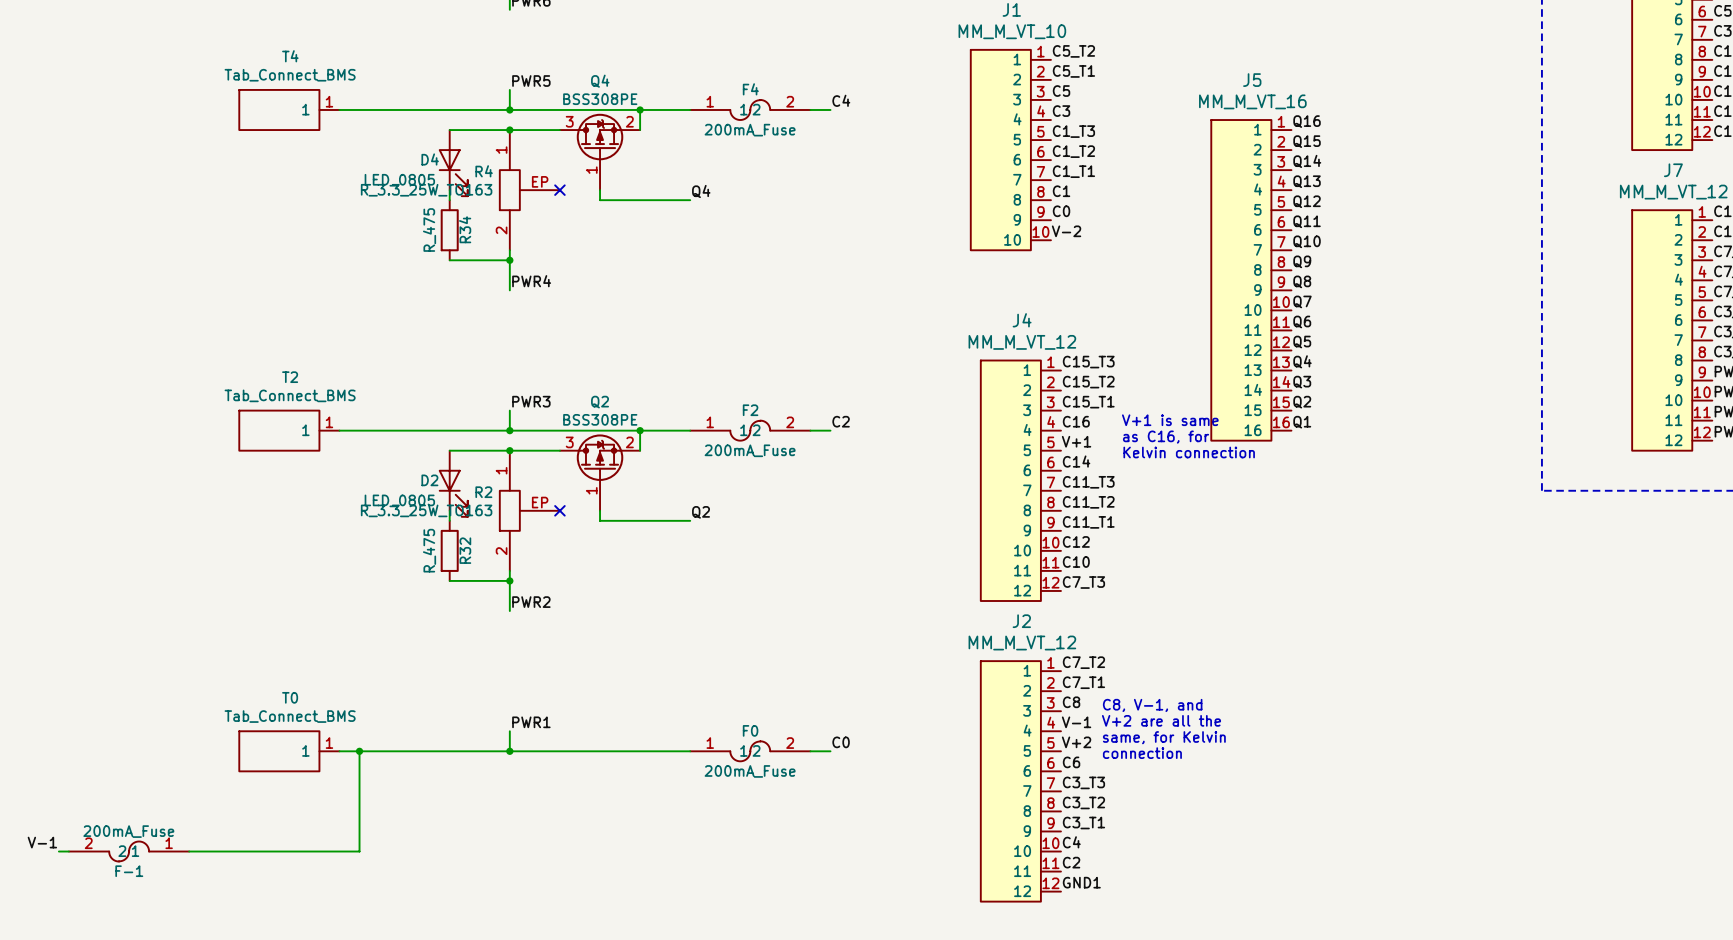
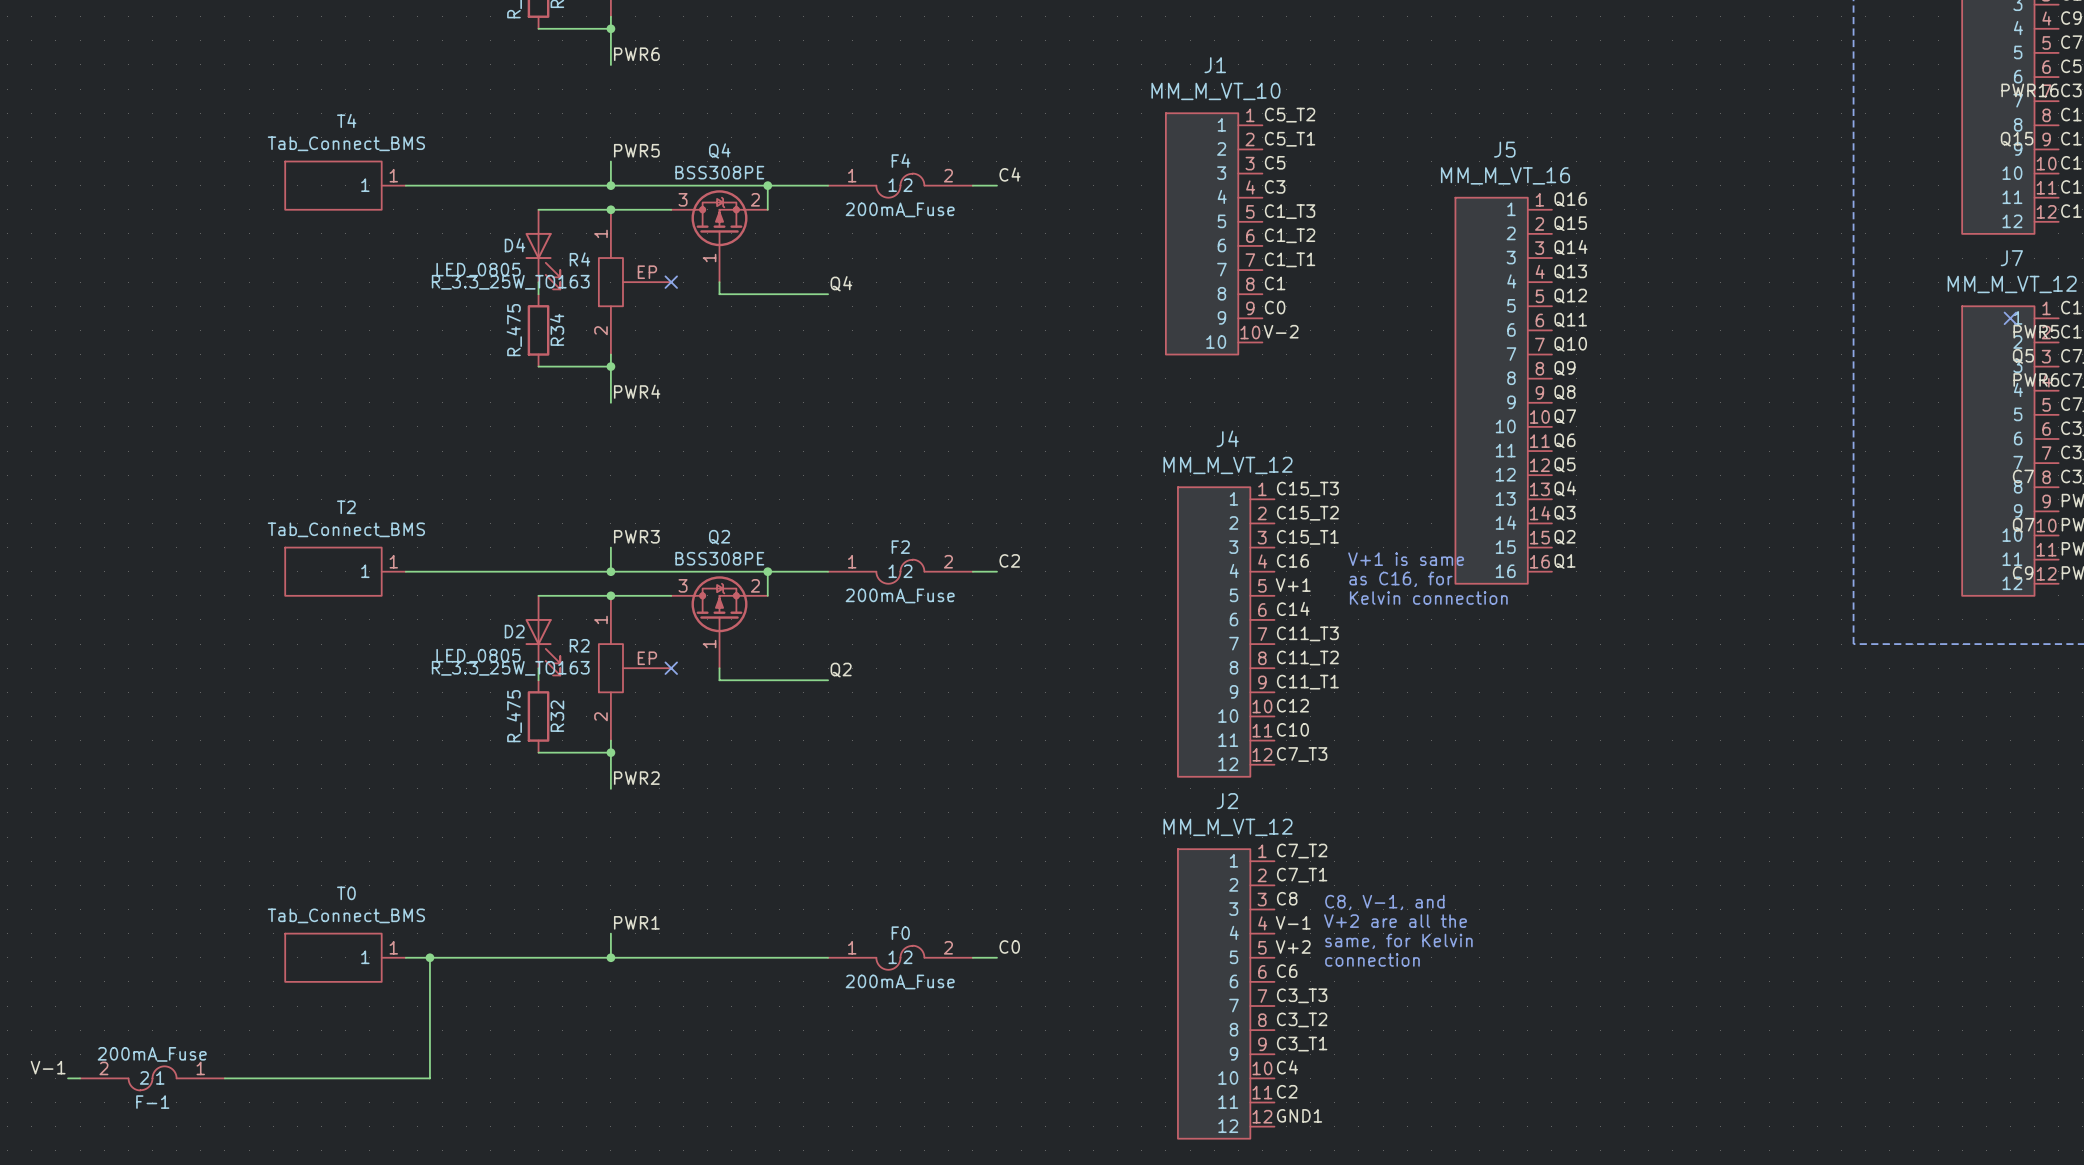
label: none -> PWR16 (2030, 90)
label: none -> Q15 (2017, 139)
no-connect mark: none -> (2010, 318)
label: none -> PWR5 (2036, 331)
label: none -> Q5 (2023, 356)
label: none -> PWR6 (2036, 379)
label: none -> C7 (2023, 476)
label: none -> Q7 (2023, 525)
label: none -> C9 (2023, 572)

